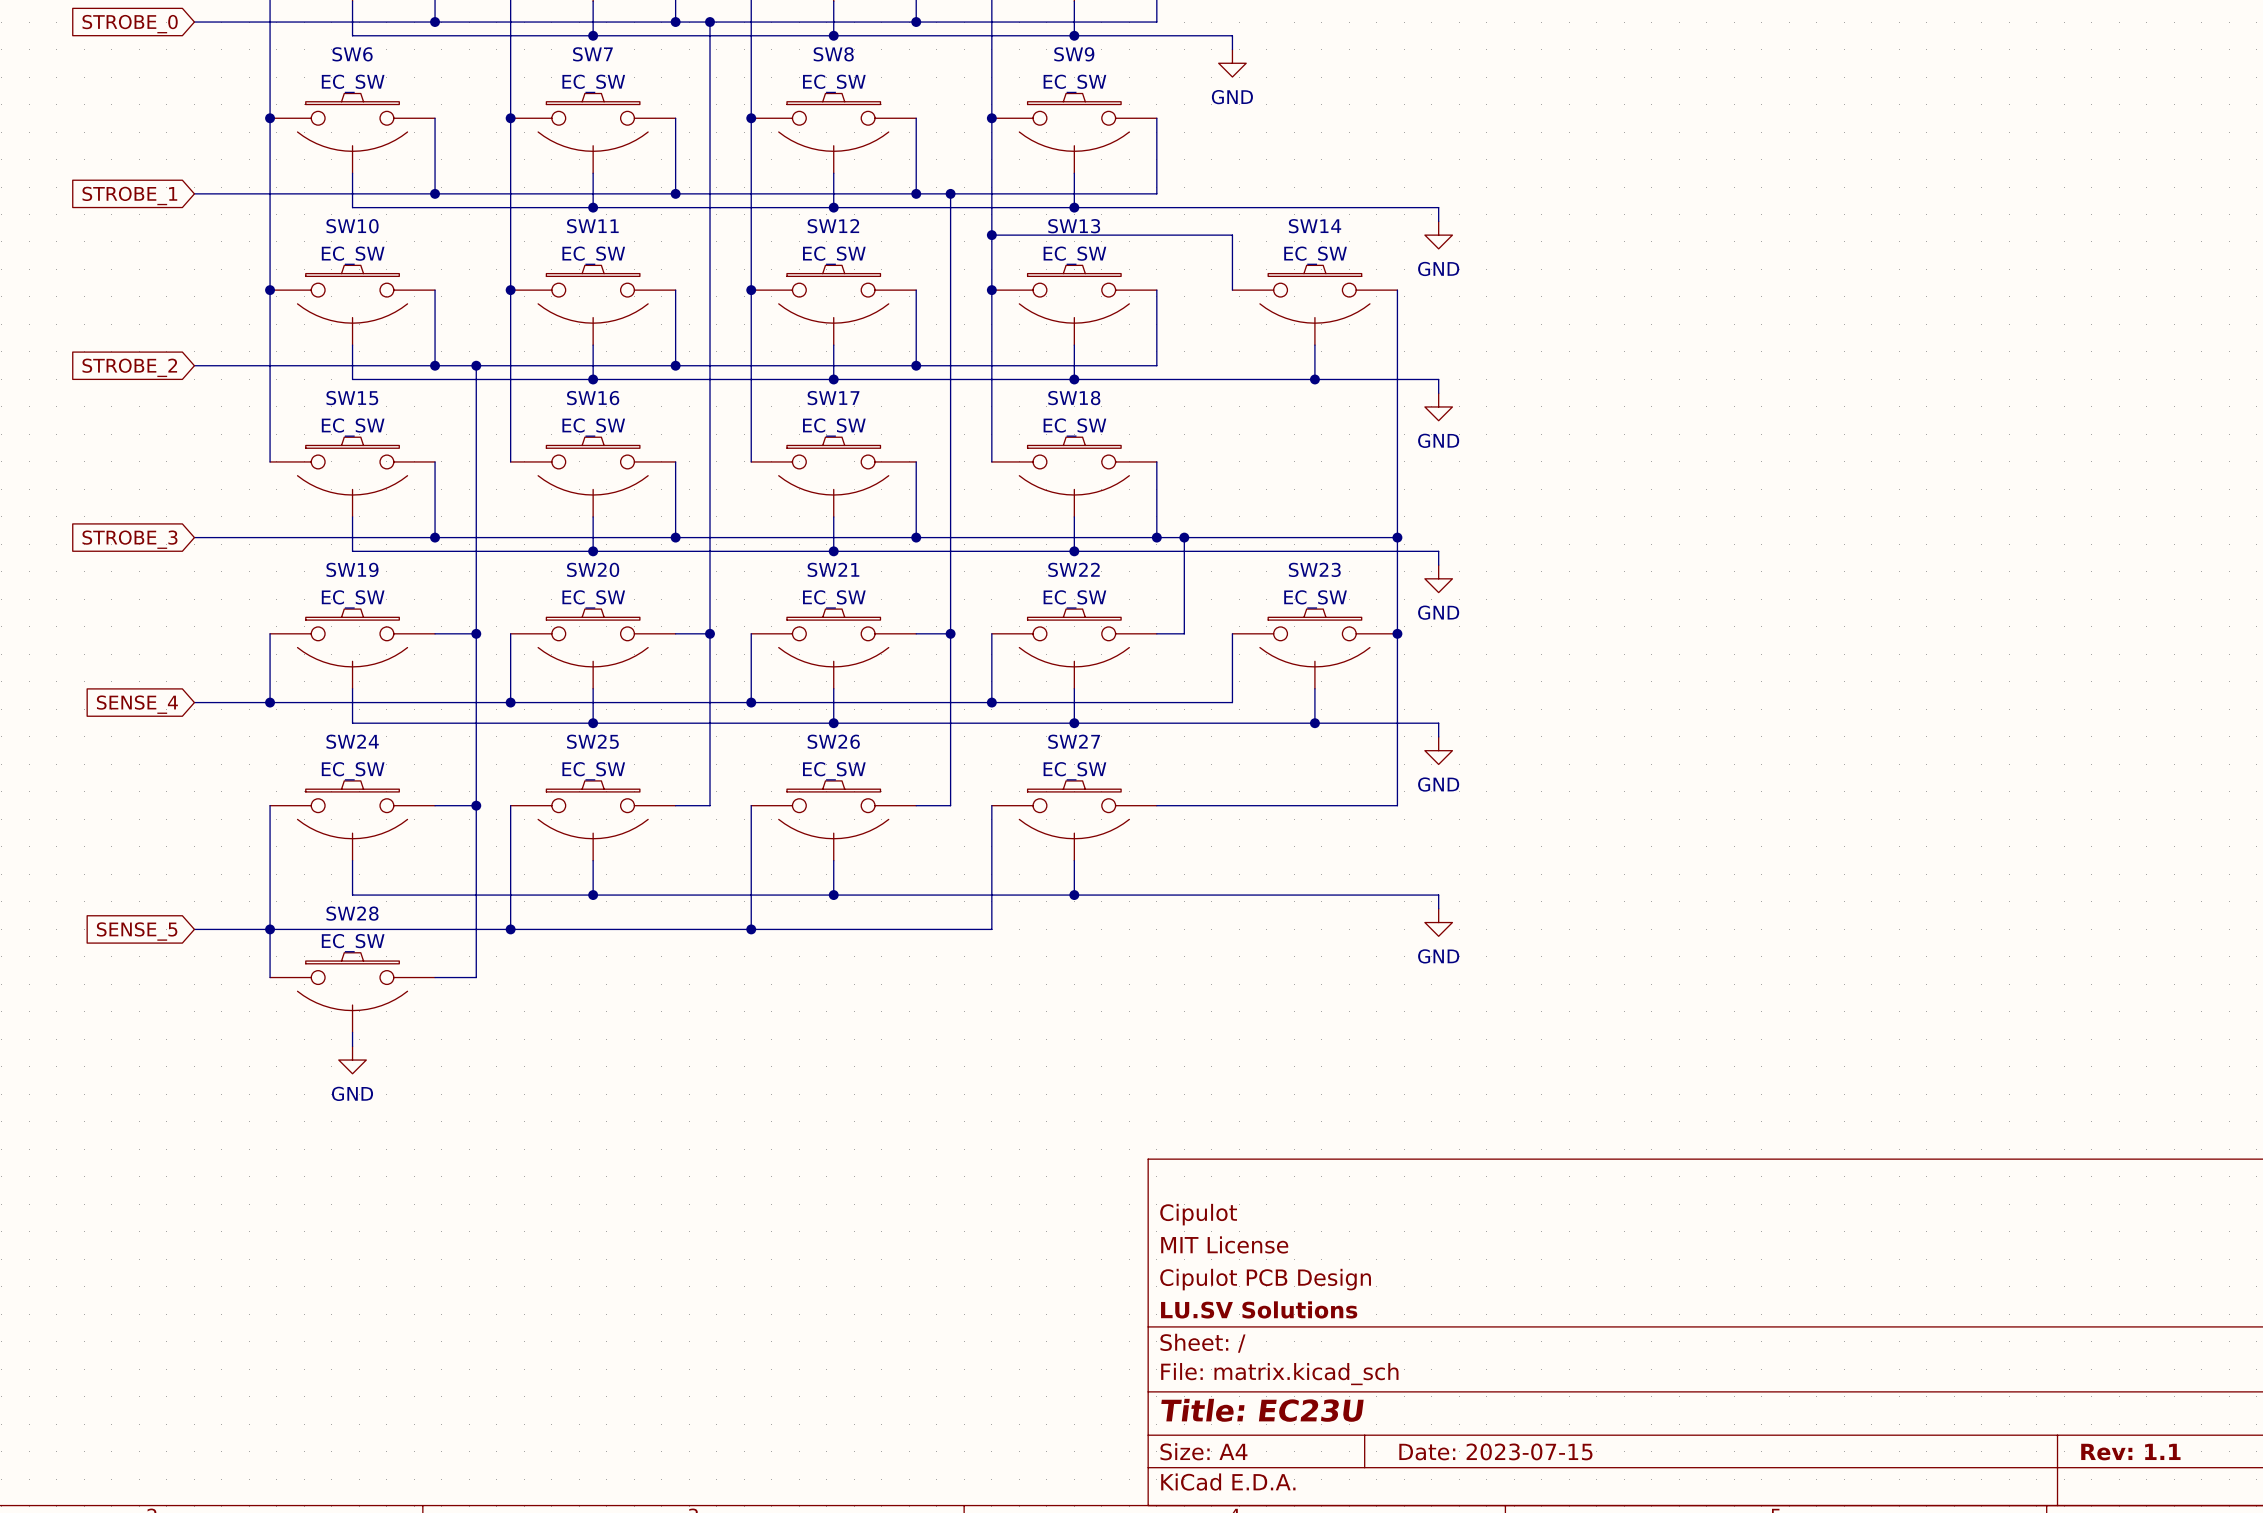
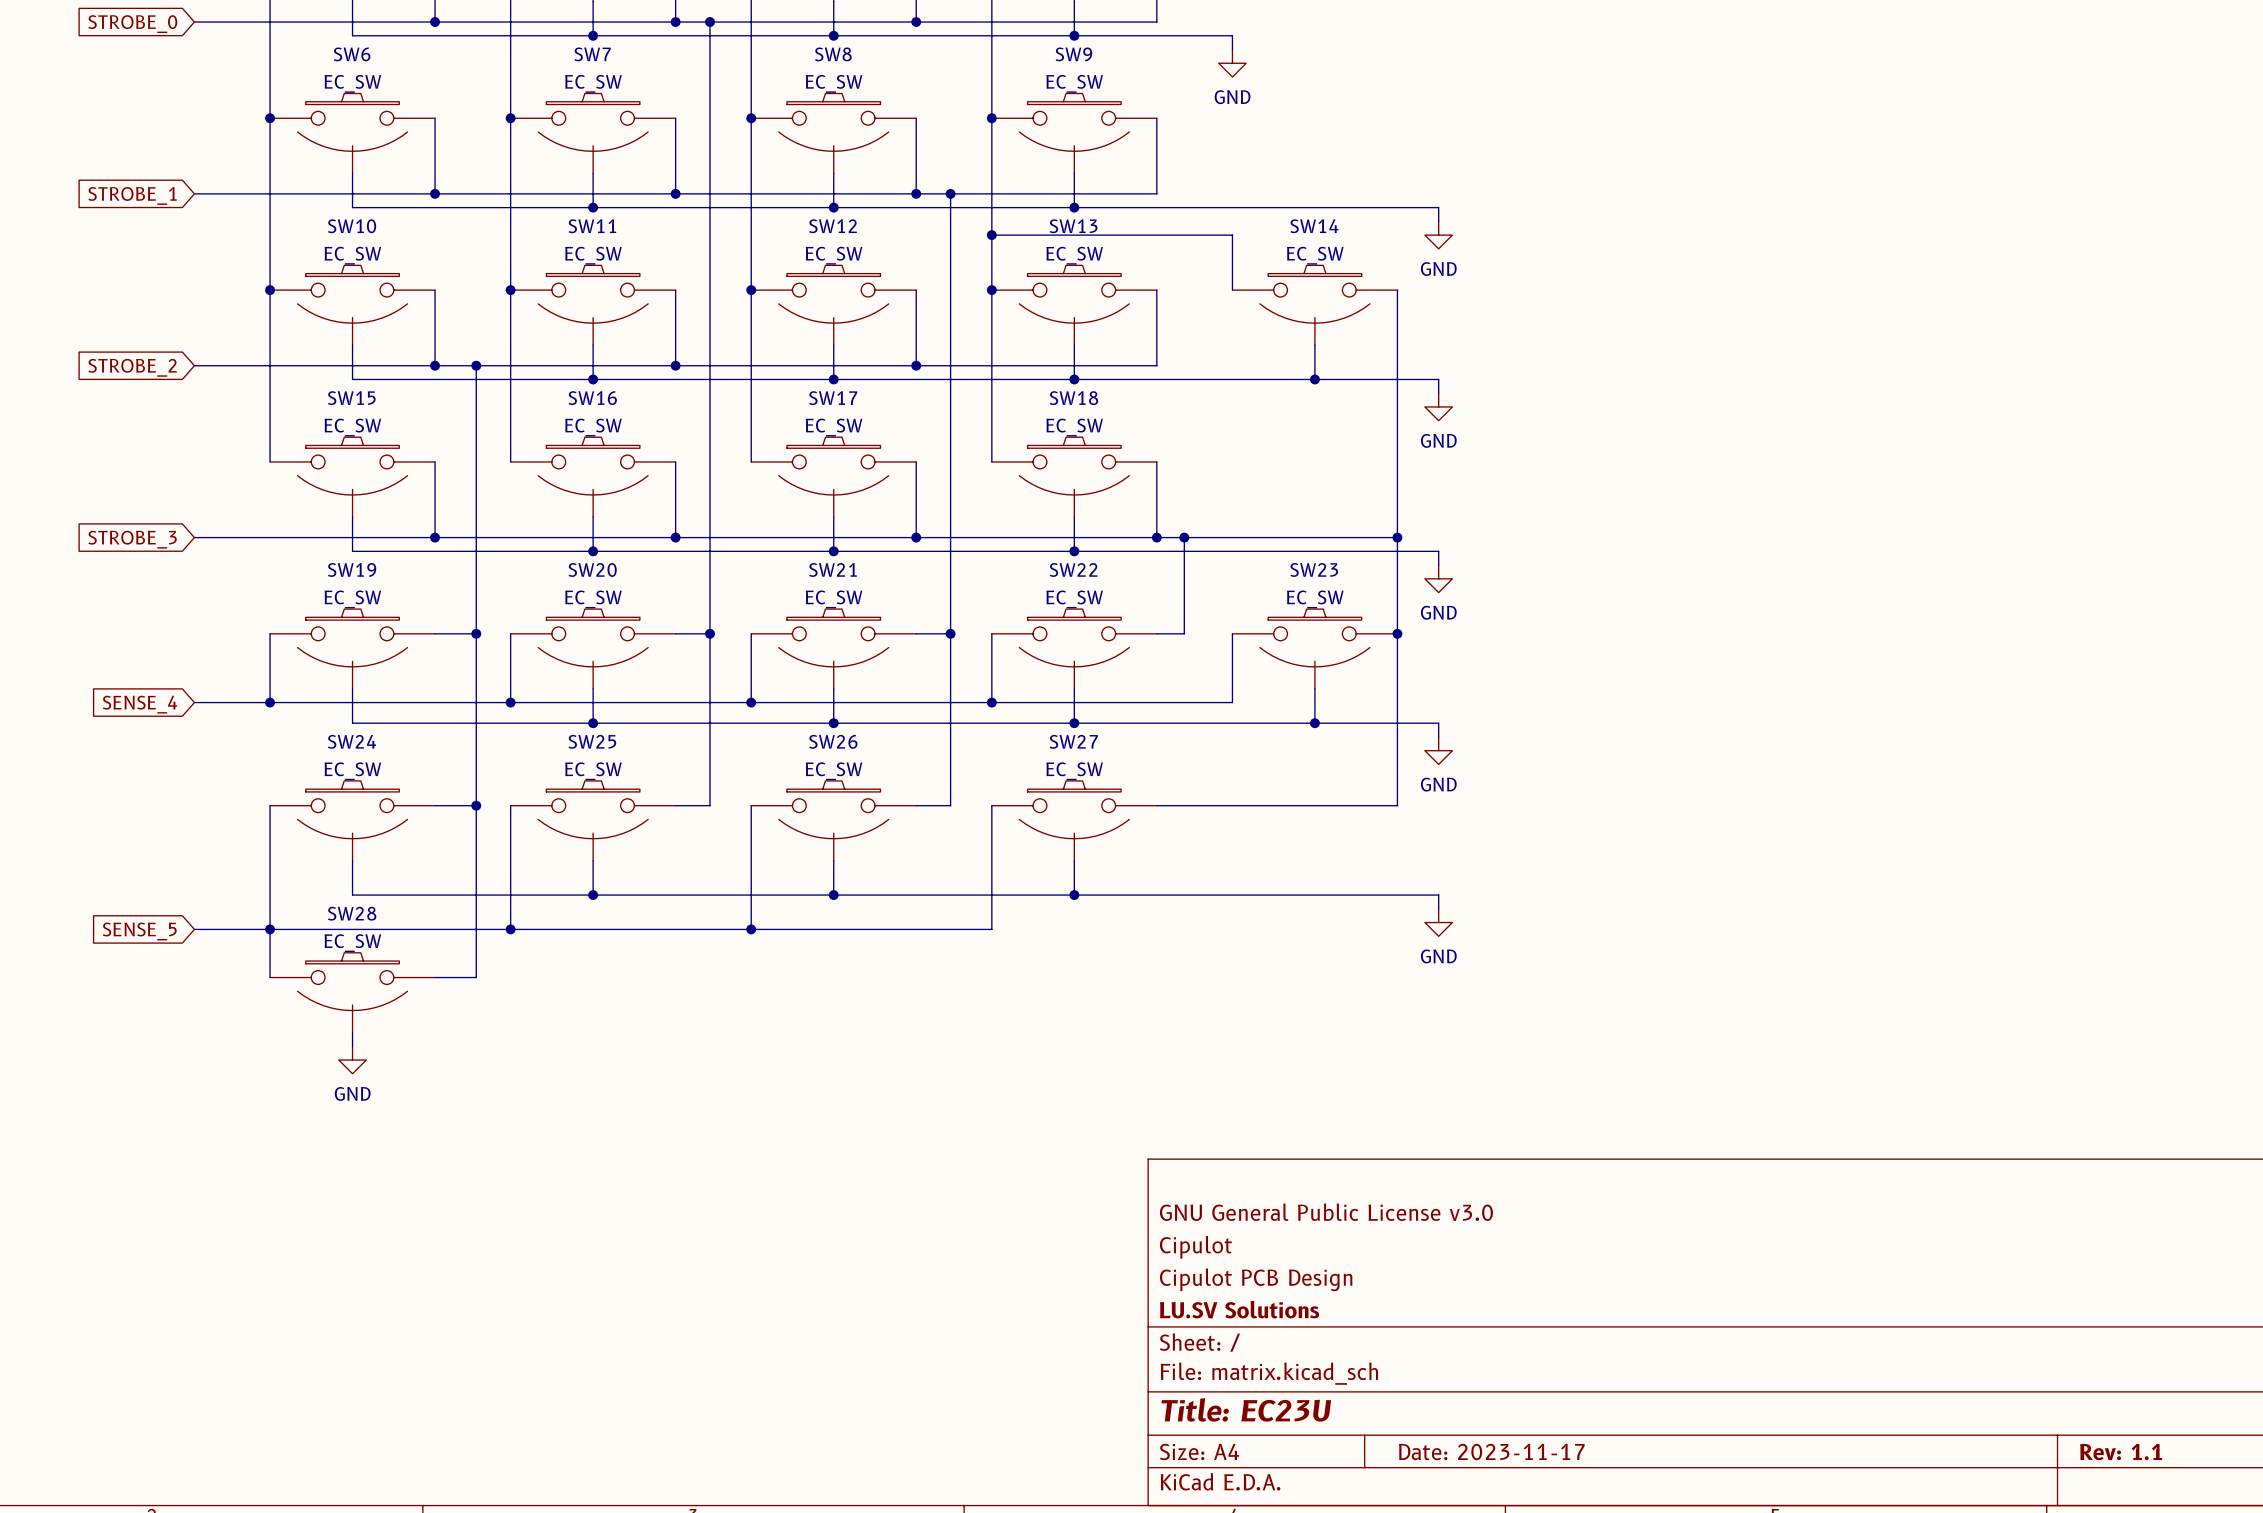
title block: Cipulot (1198, 1214) -> GNU General Public License v3.0 (1326, 1212)
title block: MIT License (1224, 1244) -> Cipulot (1195, 1247)
title block: Date: 2023-07-15 (1495, 1451) -> Date: 2023-11-17 (1491, 1451)

